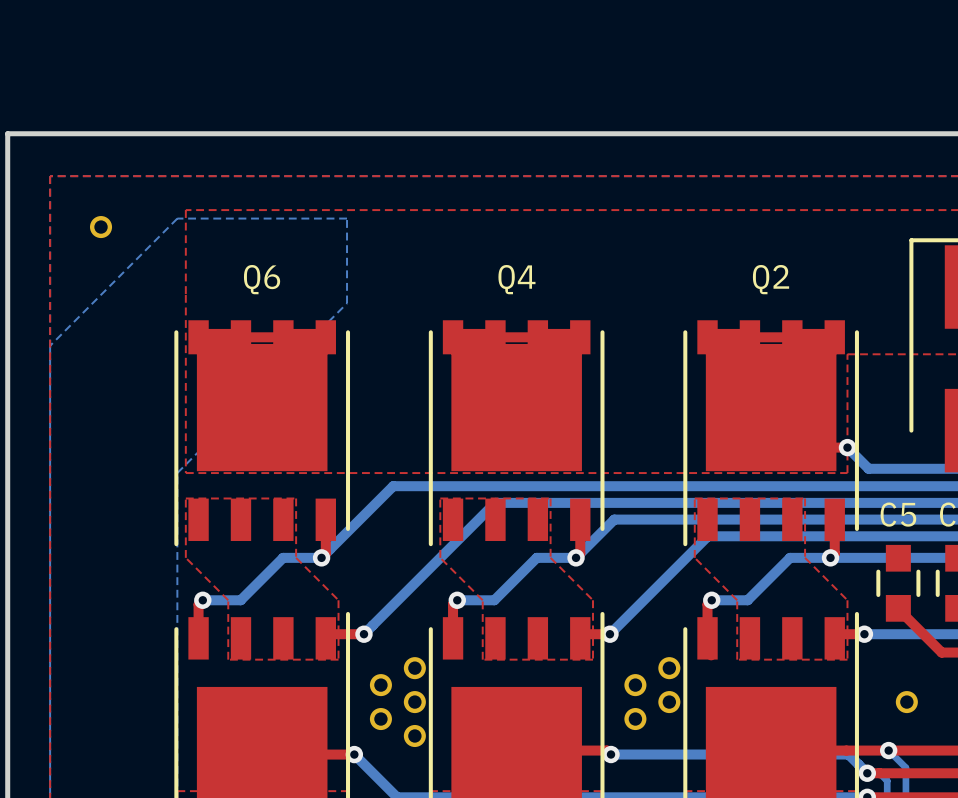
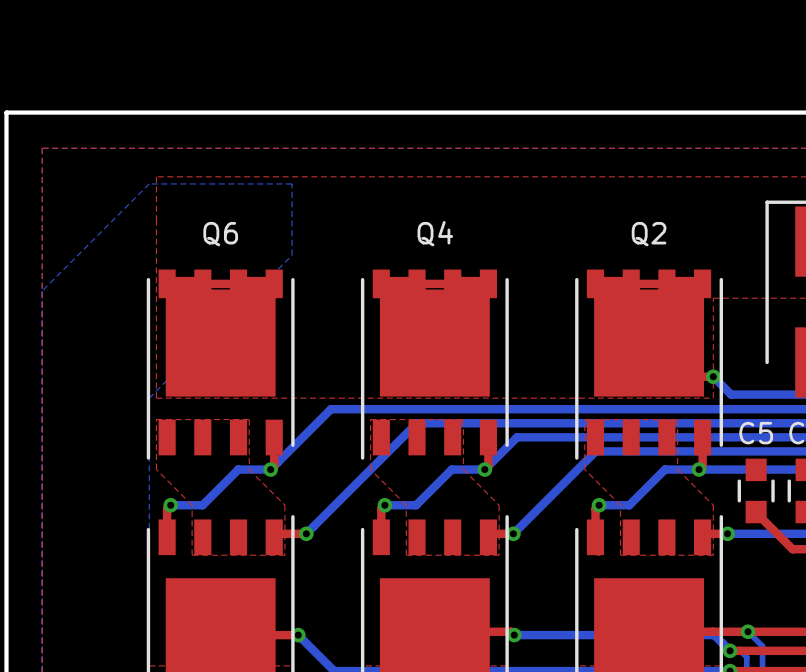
part: (101, 227) -> none
part: (414, 668) -> none
part: (669, 668) -> none
part: (380, 685) -> none
part: (635, 685) -> none
part: (414, 702) -> none
part: (669, 702) -> none
part: (906, 702) -> none
part: (380, 719) -> none
part: (635, 719) -> none
part: (414, 736) -> none

